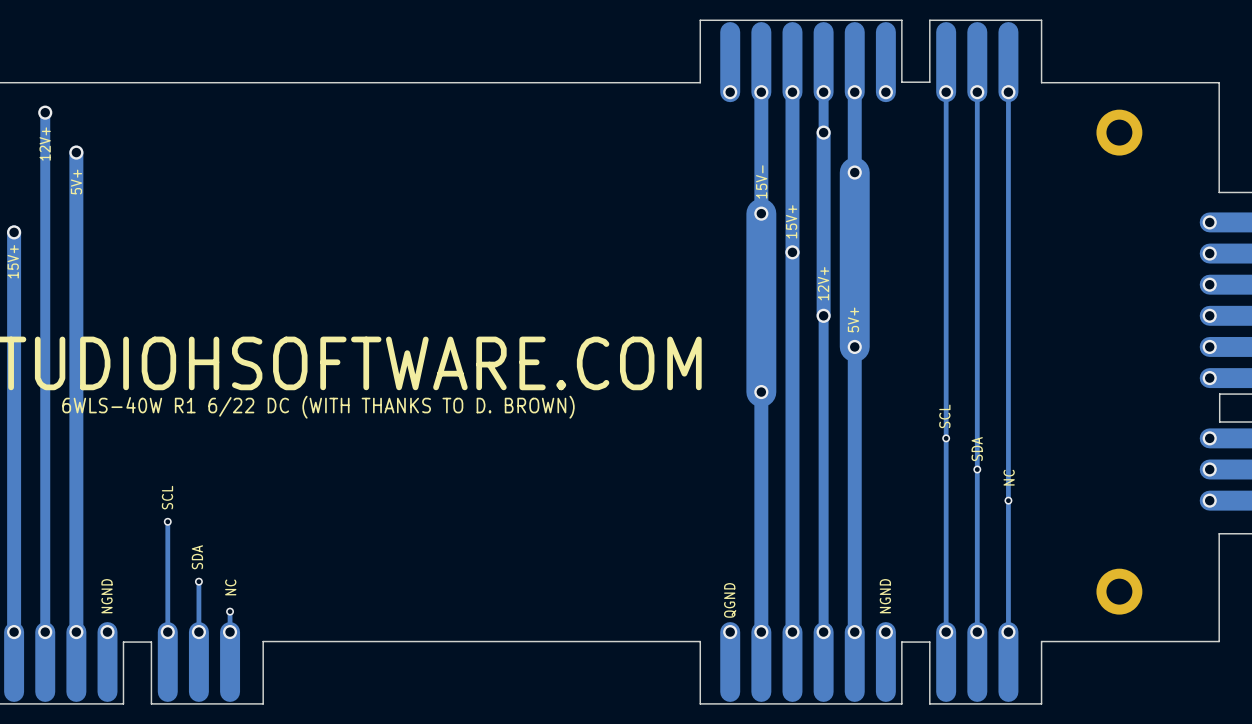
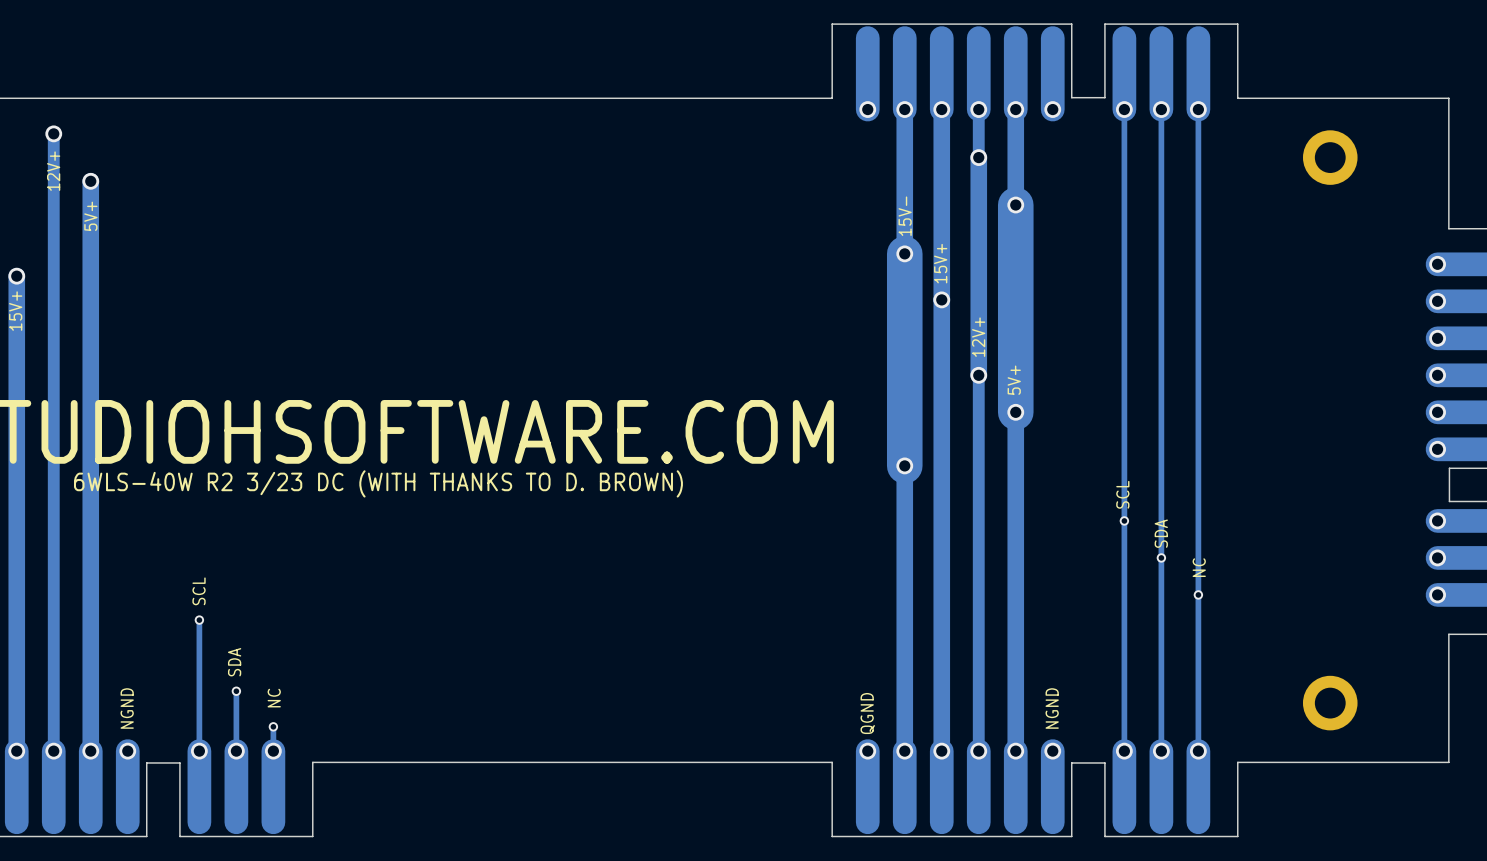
text: 6WLS-40W R1 6/22 DC (WITH THANKS TO D. BROWN) (318, 407) -> 6WLS-40W R2 3/23 DC (WITH THANKS TO D. BROWN) (378, 483)

